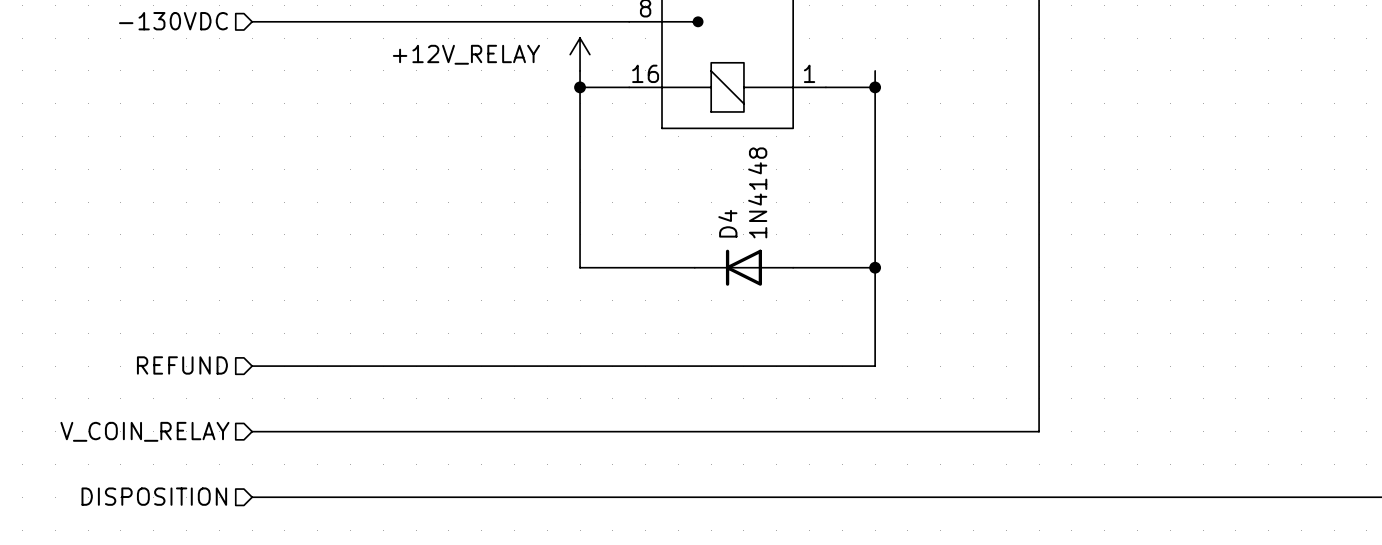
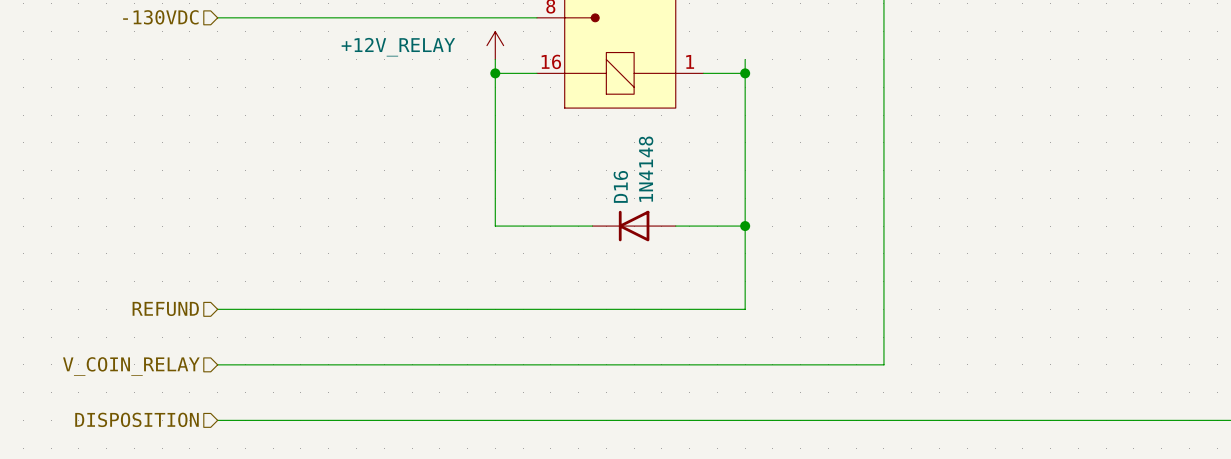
D4 name: D4 (727, 223) -> D16 (620, 186)

